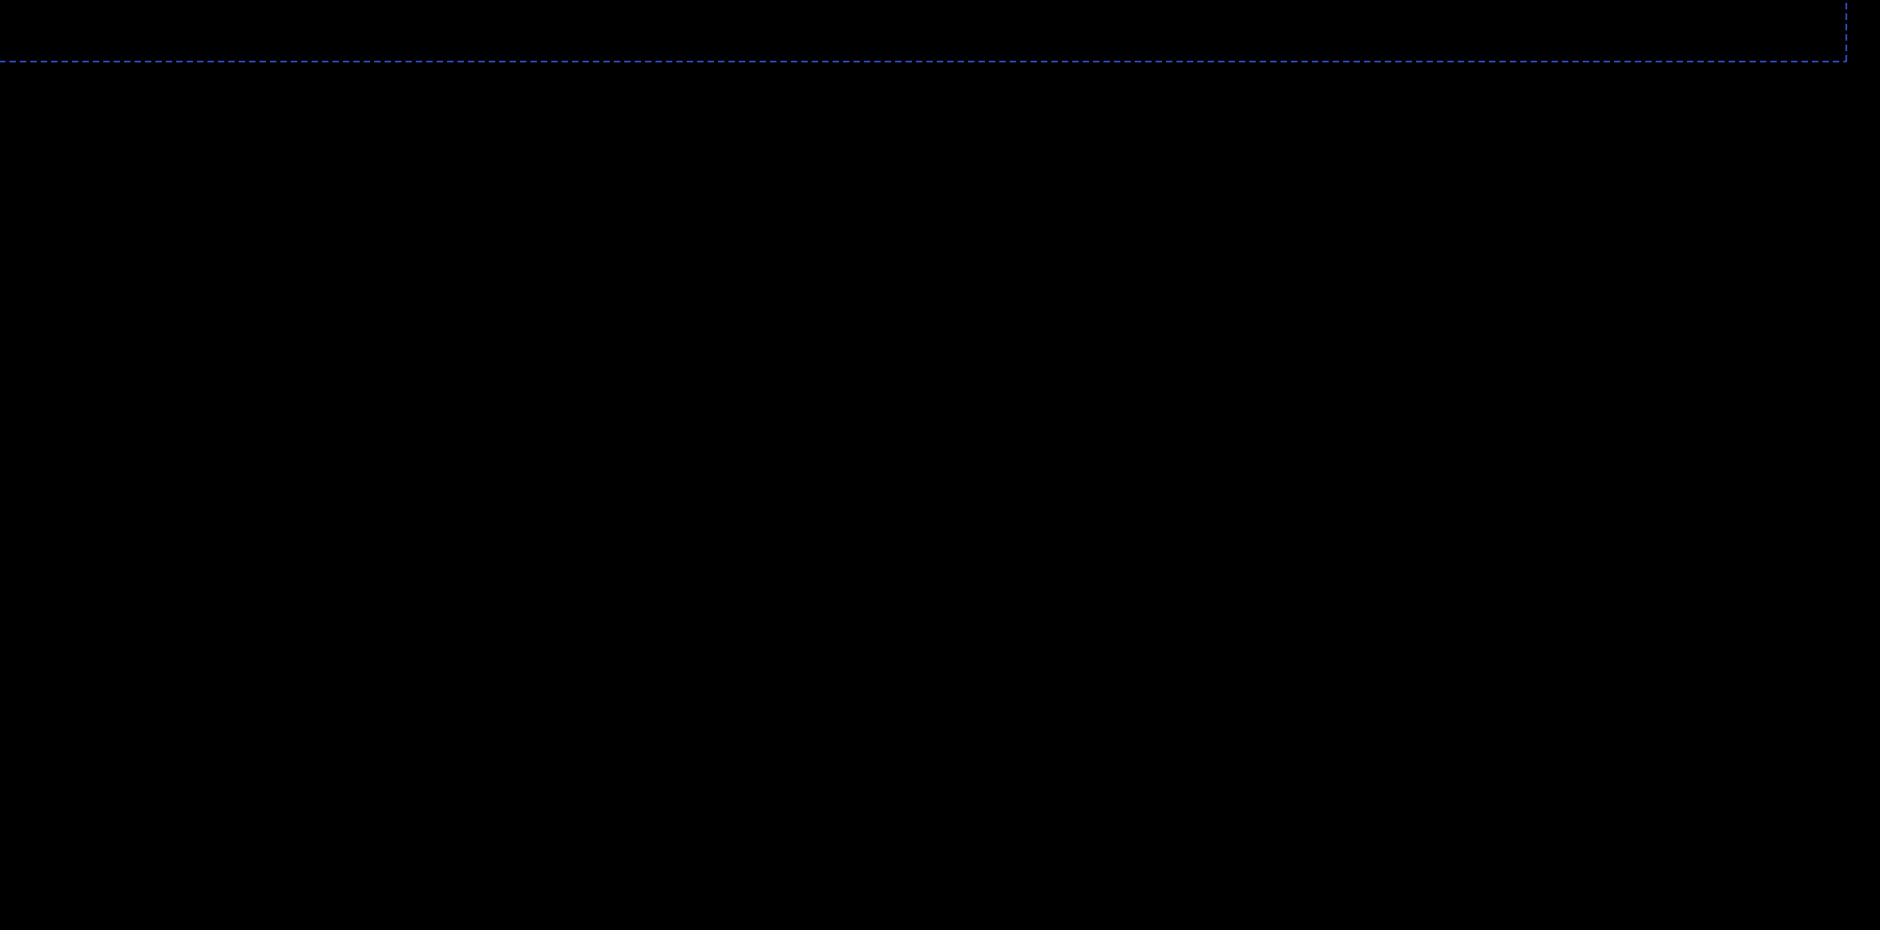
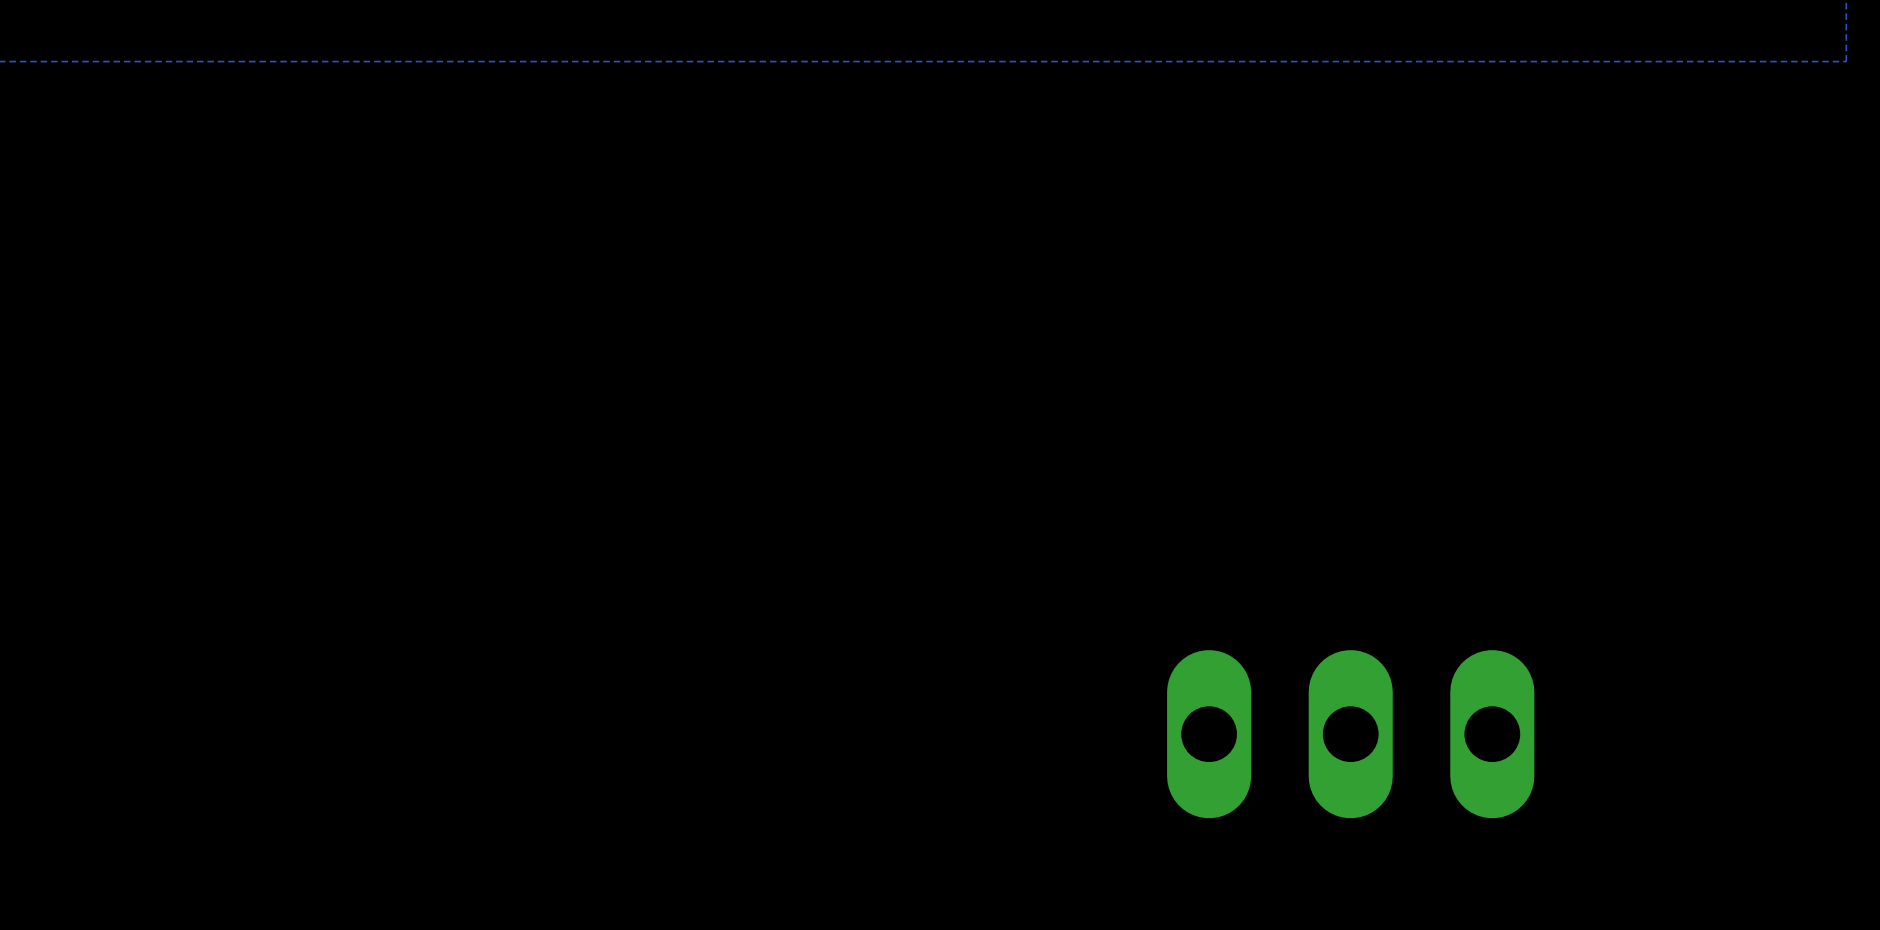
part: none -> (1350, 734)

